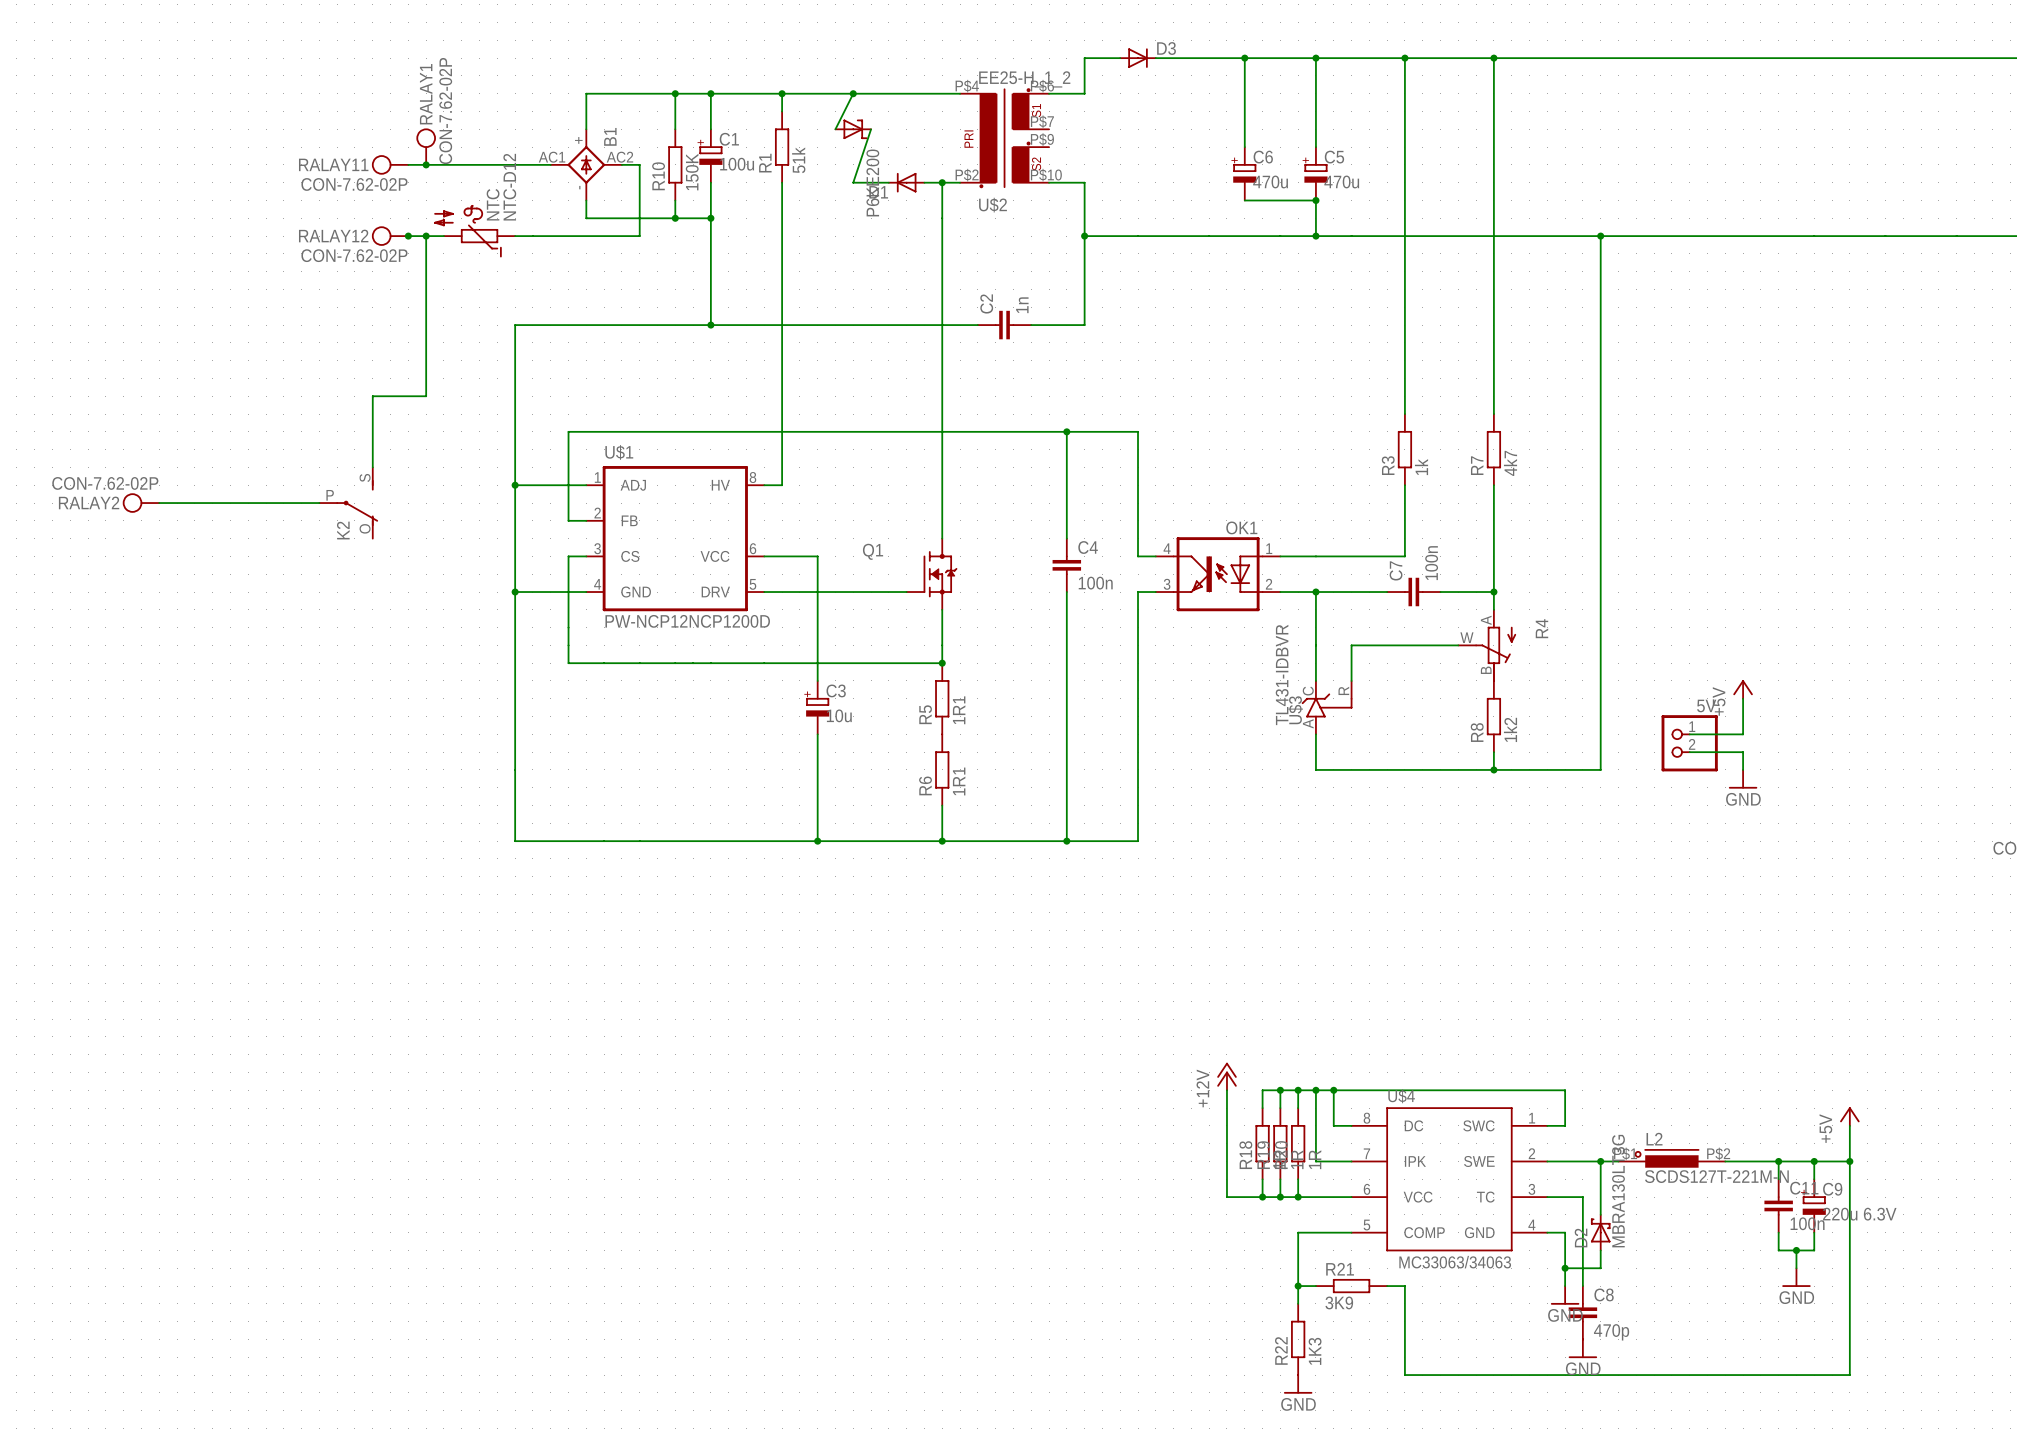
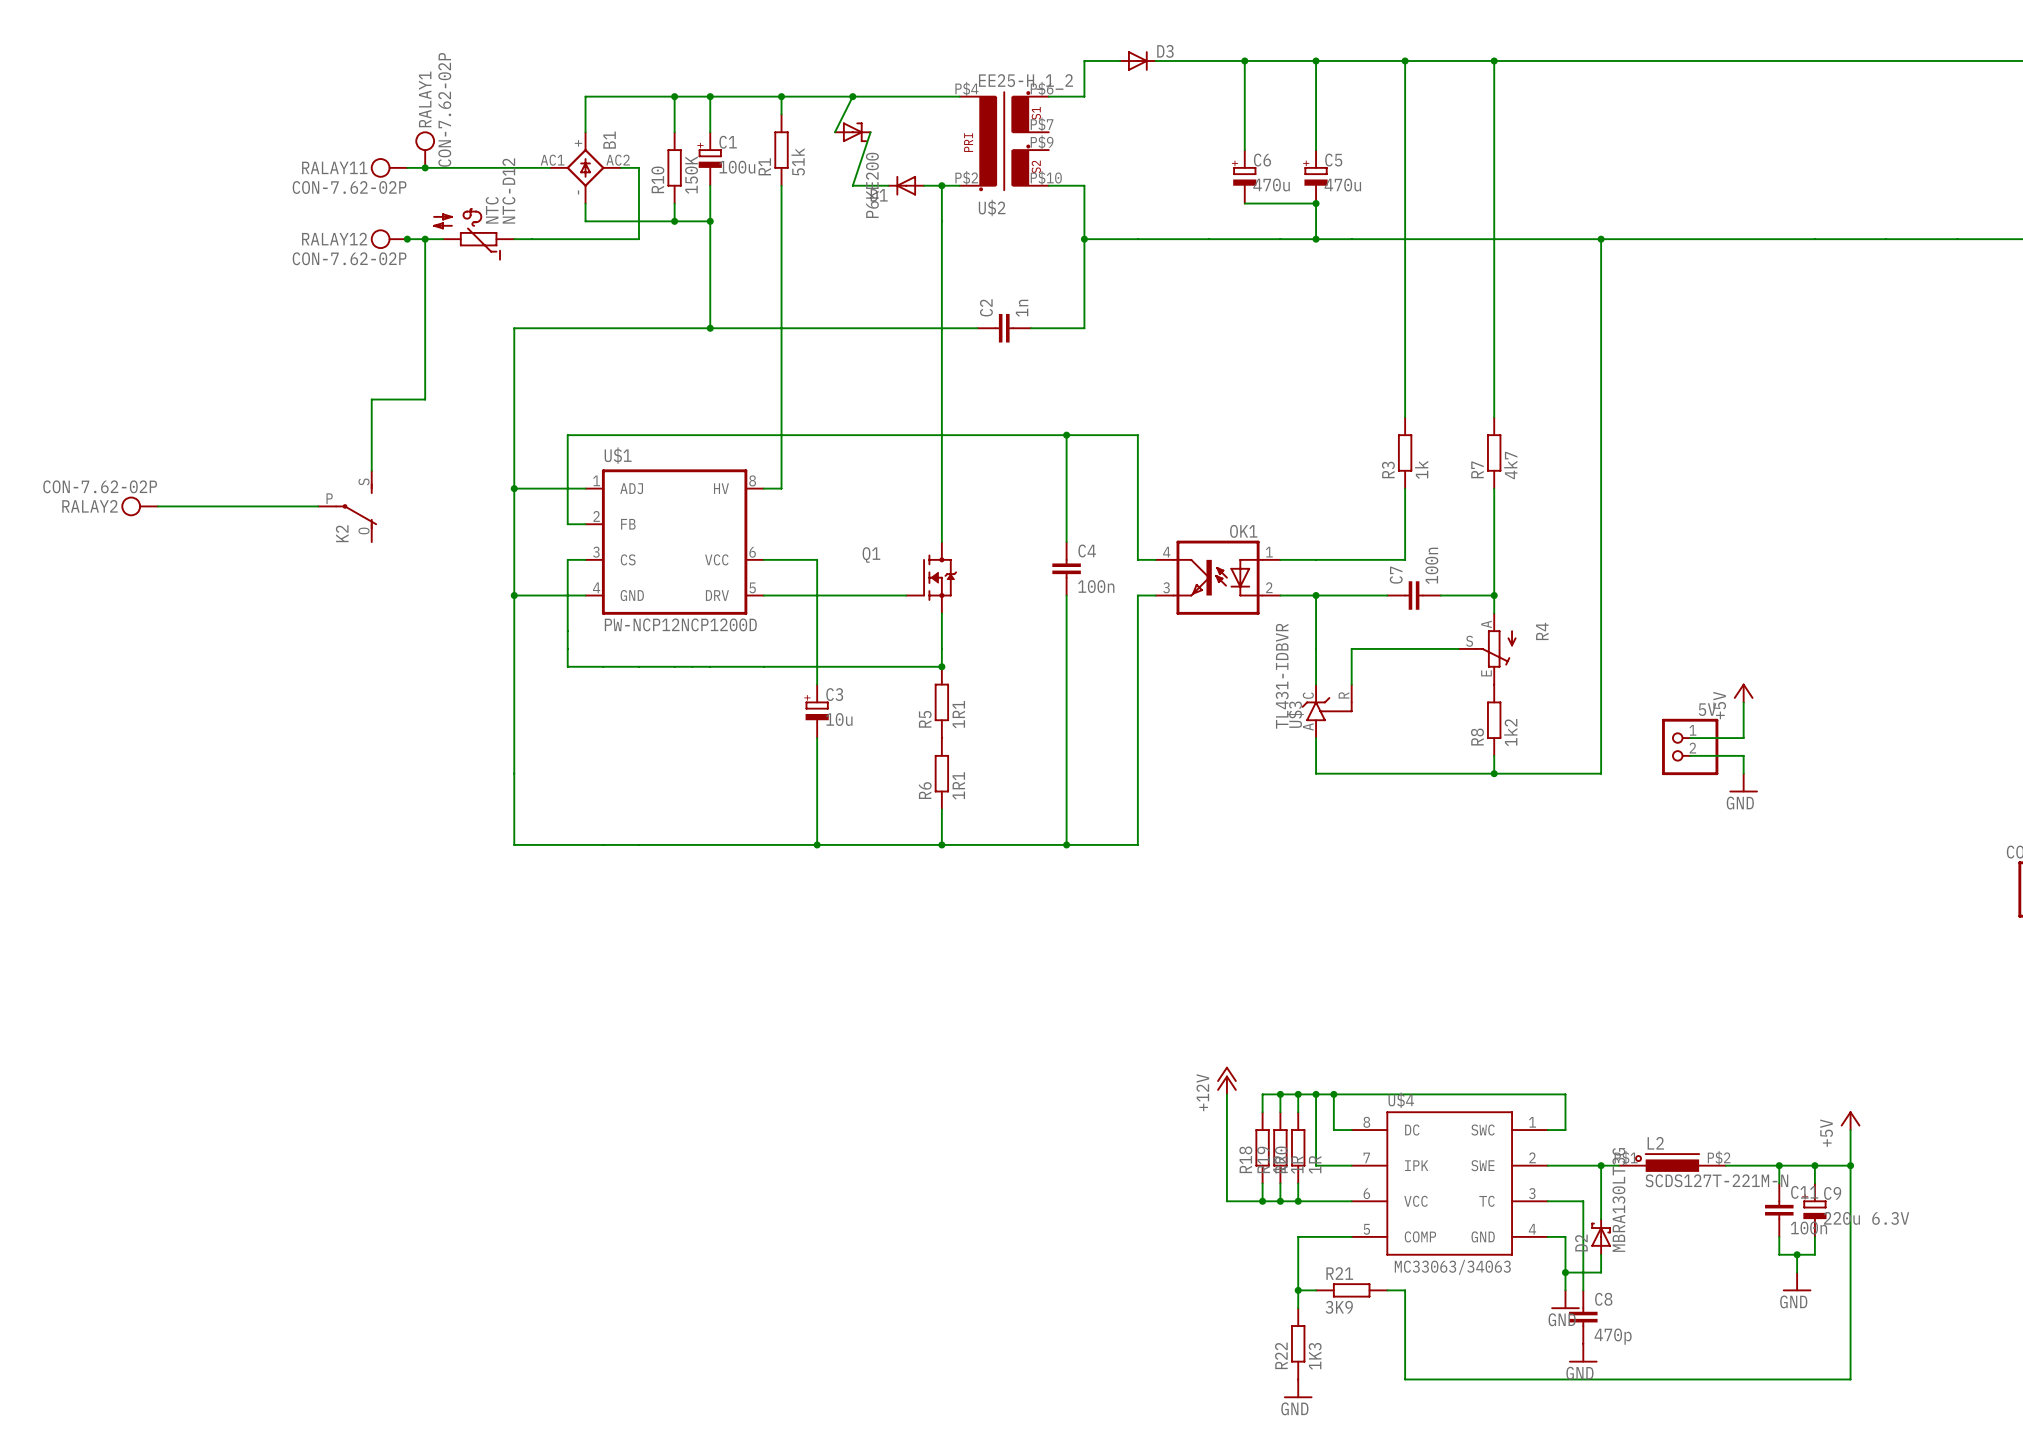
R4 symbol: [1458, 609, 1516, 682] -> [1458, 613, 1517, 685]

